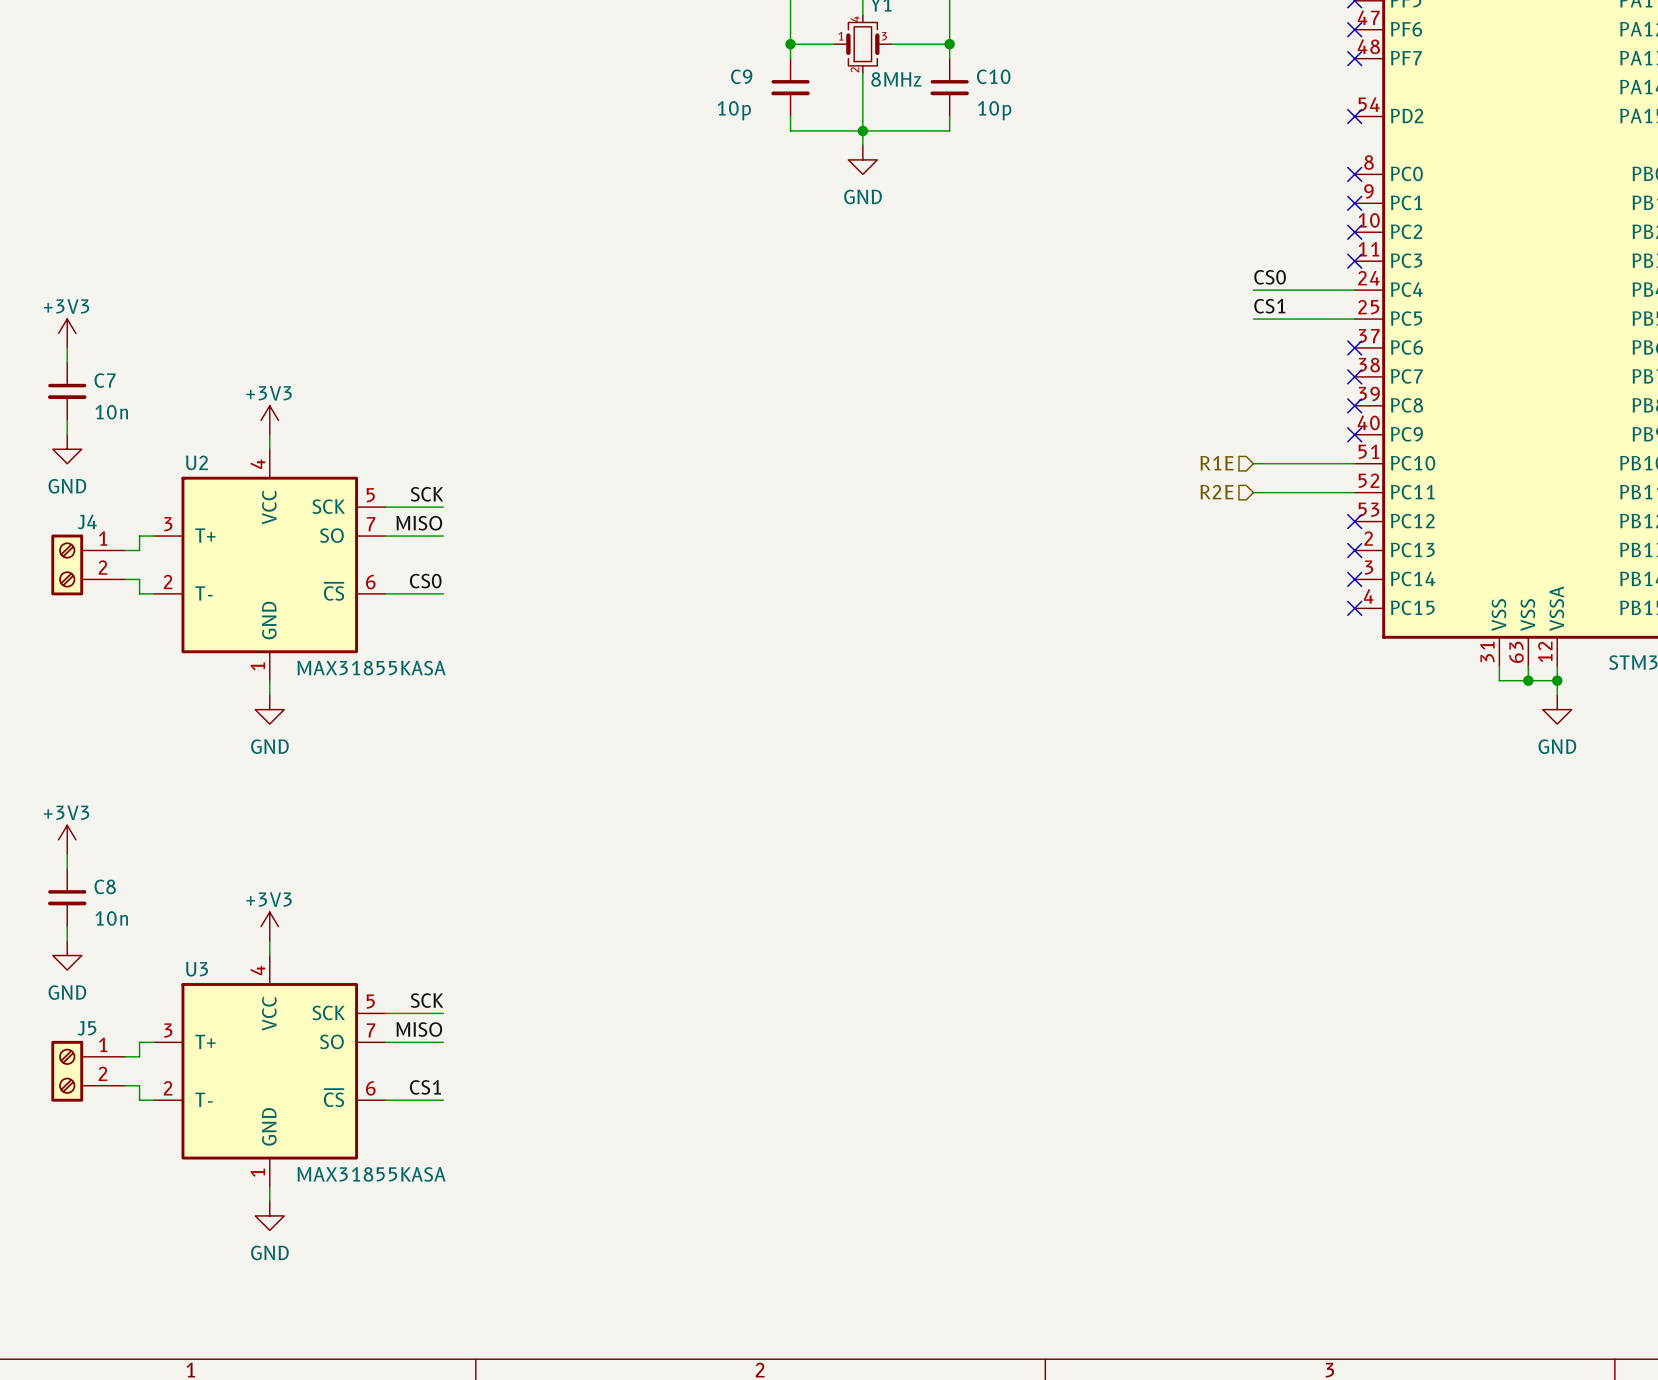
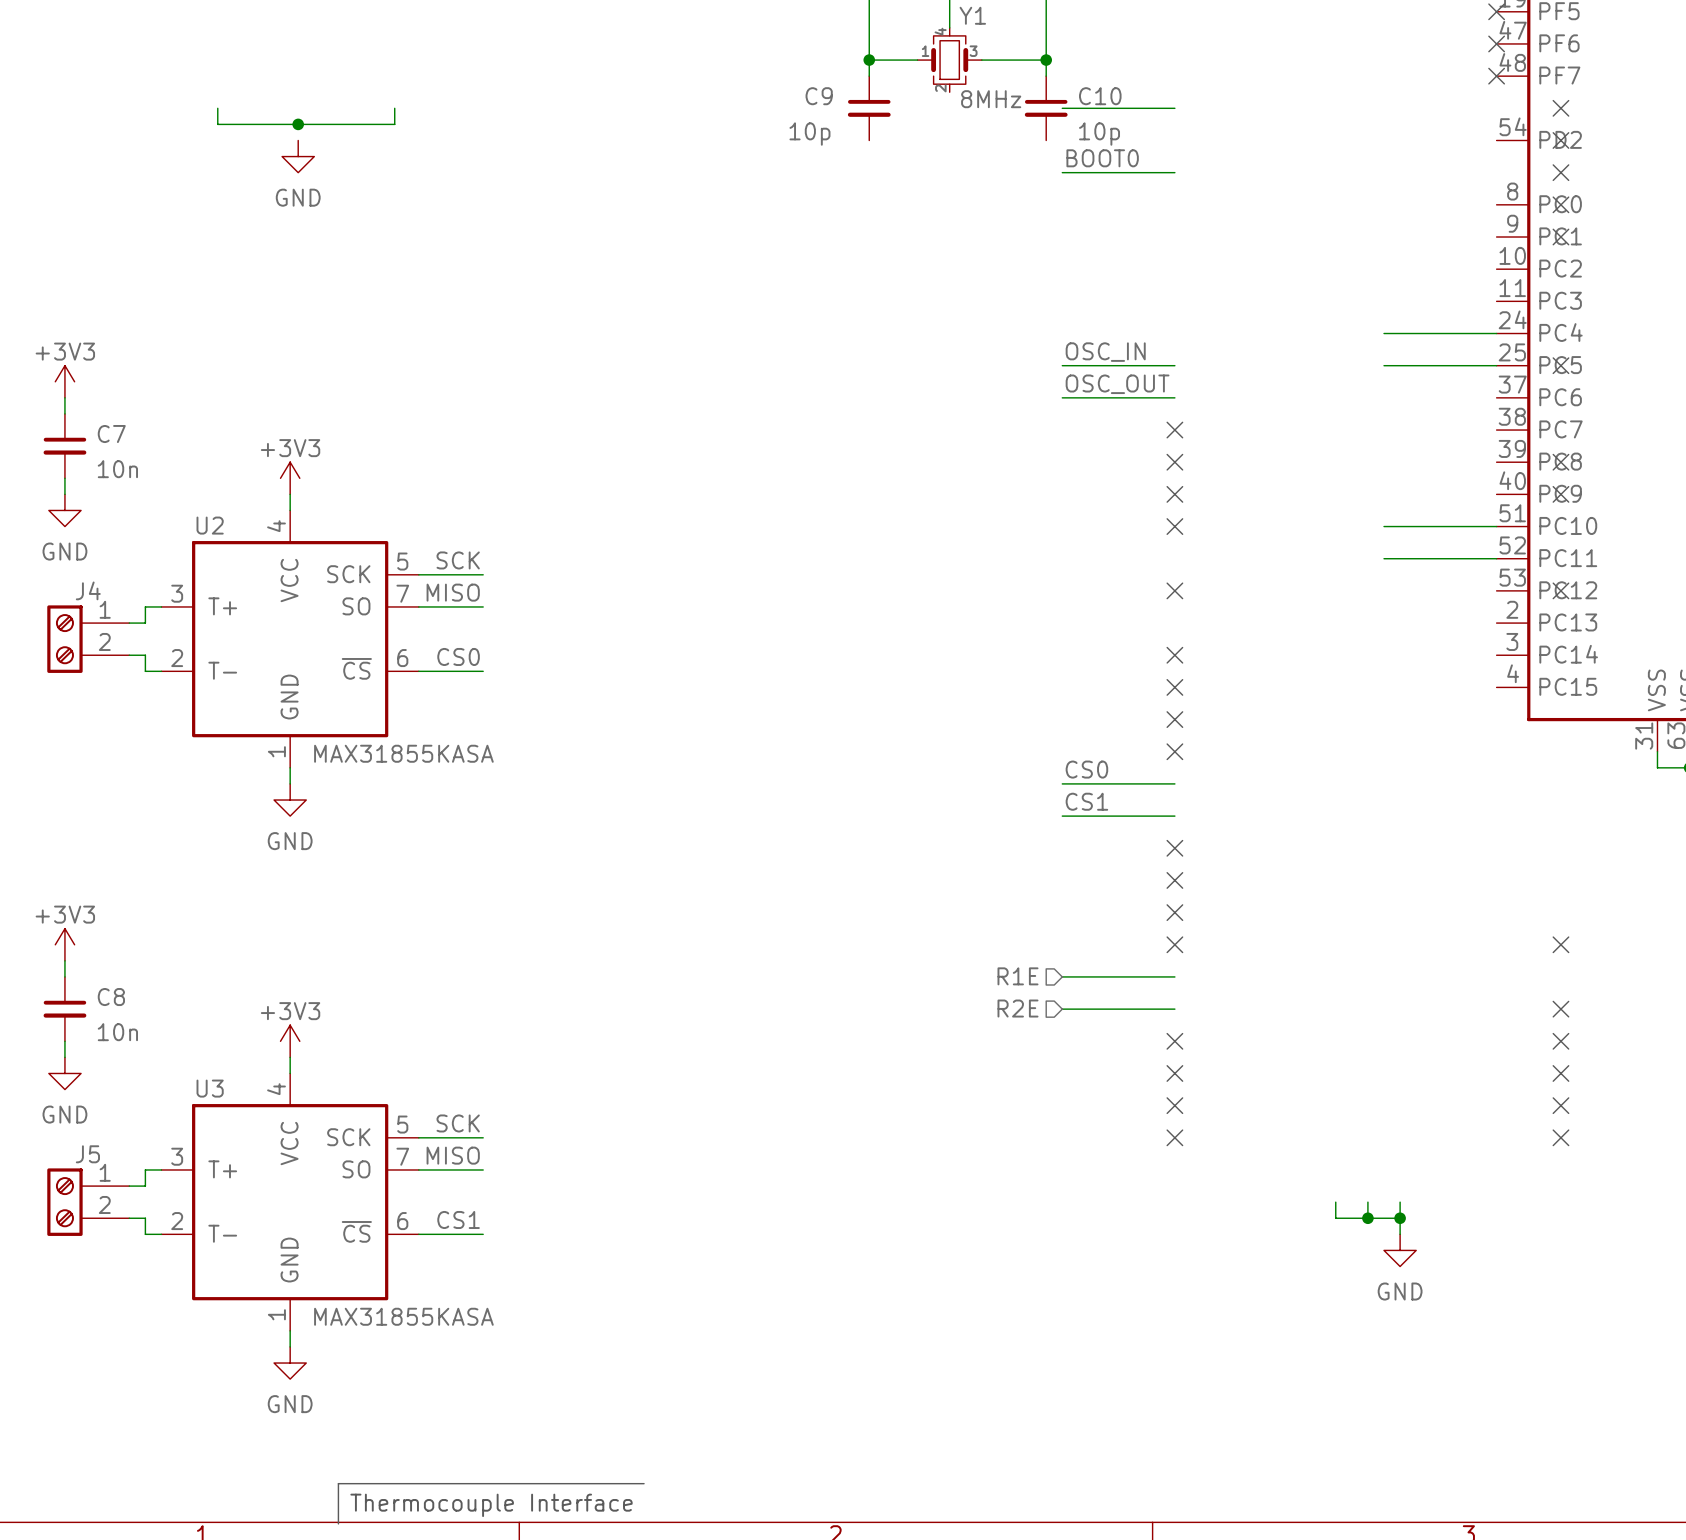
wire: (862, 73) (862, 145) -> none
wire: none -> (217, 108) (217, 124) (394, 124) (394, 108)
wire: none -> (1062, 108) (1174, 108)
no-connect mark: none -> (1560, 108)
junction: none -> (298, 124)
wire: (790, 116) (790, 130) (949, 130) (949, 116) -> none
no-connect mark: (1354, 116) -> none
no-connect mark: none -> (1560, 140)
power symbol: none -> GND (298, 156)
junction: (862, 130) -> none
label: none -> BOOT0 (1102, 158)
wire: none -> (1062, 172) (1174, 172)
no-connect mark: none -> (1560, 172)
power symbol: GND (862, 159) -> none
no-connect mark: (1354, 174) -> none
no-connect mark: none -> (1560, 204)
no-connect mark: (1354, 203) -> none
no-connect mark: none -> (1560, 237)
no-connect mark: (1354, 232) -> none
no-connect mark: (1354, 261) -> none
label: CS0 (1270, 277) -> none
label: CS1 (1269, 306) -> none
label: none -> OSC_IN (1105, 352)
wire: none -> (1062, 365) (1174, 365)
no-connect mark: none -> (1560, 365)
label: none -> OSC_OUT (1117, 384)
wire: none -> (1062, 397) (1174, 397)
no-connect mark: (1354, 347) -> none
no-connect mark: none -> (1174, 430)
no-connect mark: (1354, 376) -> none
no-connect mark: none -> (1174, 462)
no-connect mark: (1354, 405) -> none
no-connect mark: none -> (1560, 462)
no-connect mark: none -> (1174, 494)
no-connect mark: (1354, 434) -> none
no-connect mark: none -> (1560, 494)
no-connect mark: none -> (1174, 526)
hierarchical label: R1E (1217, 463) -> none
hierarchical label: R2E (1217, 492) -> none
no-connect mark: none -> (1174, 590)
no-connect mark: (1354, 521) -> none
no-connect mark: none -> (1560, 590)
no-connect mark: (1354, 550) -> none
no-connect mark: none -> (1174, 655)
no-connect mark: (1354, 579) -> none
no-connect mark: none -> (1174, 687)
no-connect mark: (1354, 608) -> none
no-connect mark: none -> (1174, 719)
no-connect mark: none -> (1174, 751)
label: none -> CS0 (1086, 769)
wire: none -> (1062, 783) (1174, 783)
label: none -> CS1 (1086, 801)
wire: none -> (1062, 816) (1174, 816)
no-connect mark: none -> (1174, 848)
no-connect mark: none -> (1174, 880)
no-connect mark: none -> (1174, 912)
no-connect mark: none -> (1174, 944)
no-connect mark: none -> (1560, 944)
hierarchical label: none -> R1E (1018, 976)
wire: none -> (1062, 976) (1174, 976)
hierarchical label: none -> R2E (1018, 1008)
wire: none -> (1062, 1009) (1174, 1009)
no-connect mark: none -> (1560, 1009)
no-connect mark: none -> (1174, 1041)
no-connect mark: none -> (1560, 1041)
no-connect mark: none -> (1174, 1073)
no-connect mark: none -> (1560, 1073)
no-connect mark: none -> (1174, 1105)
no-connect mark: none -> (1560, 1105)
no-connect mark: none -> (1174, 1137)
no-connect mark: none -> (1560, 1137)
wire: none -> (1335, 1202) (1335, 1218) (1400, 1218)
wire: none -> (1367, 1202) (1367, 1218)
wire: none -> (1400, 1202) (1400, 1234)
junction: none -> (1367, 1218)
junction: none -> (1400, 1218)
power symbol: none -> GND (1400, 1250)
line: none -> (644, 1483) (338, 1483) (338, 1523)
text: none -> Thermocouple Interface (491, 1505)

